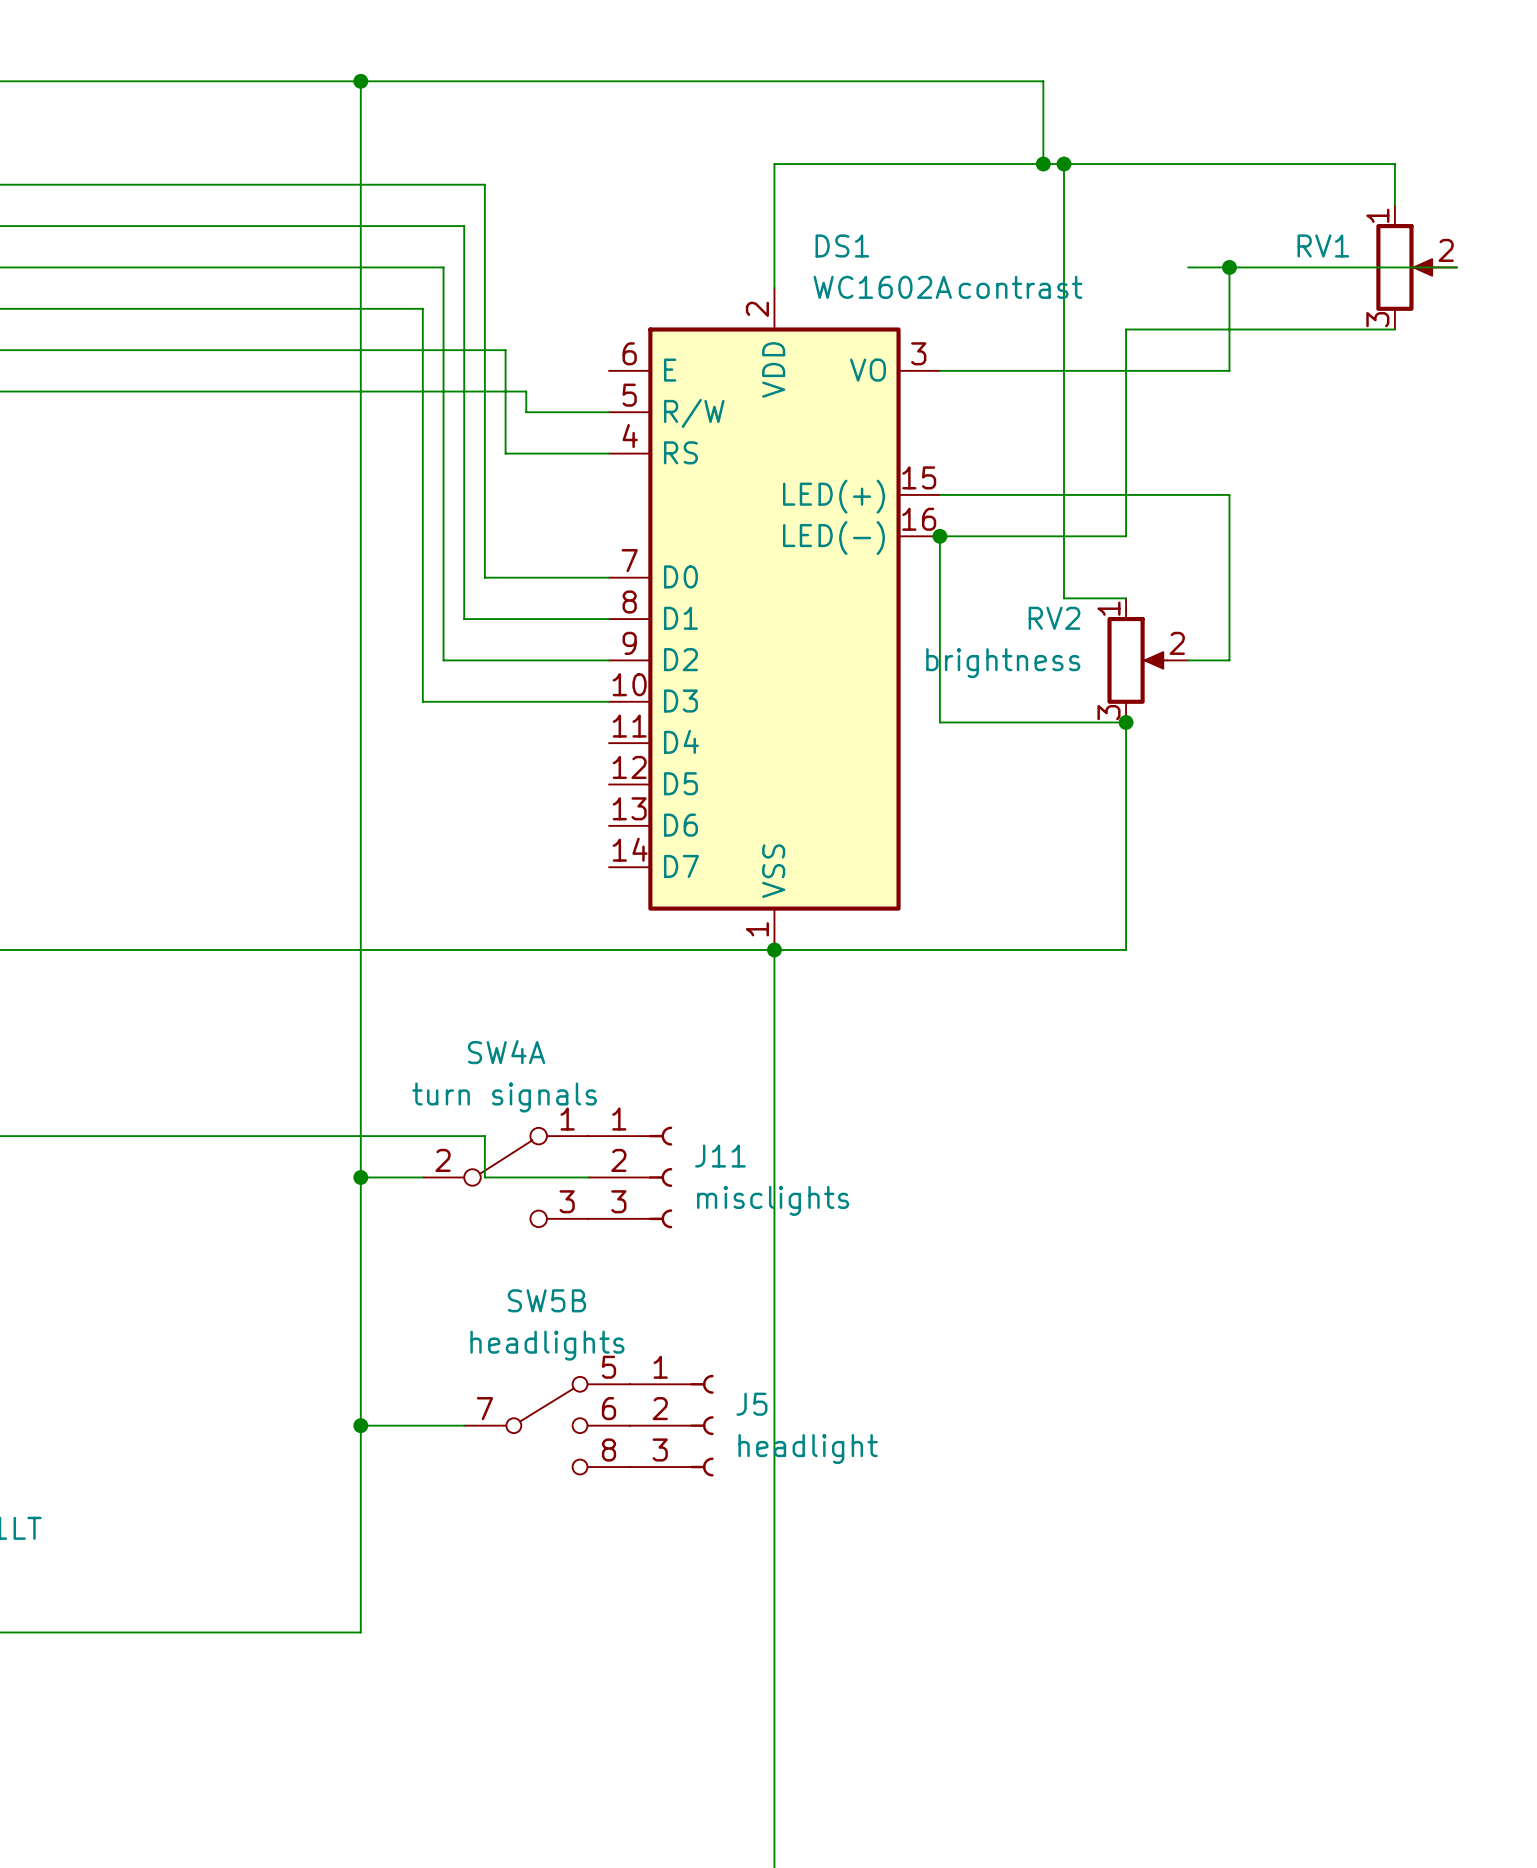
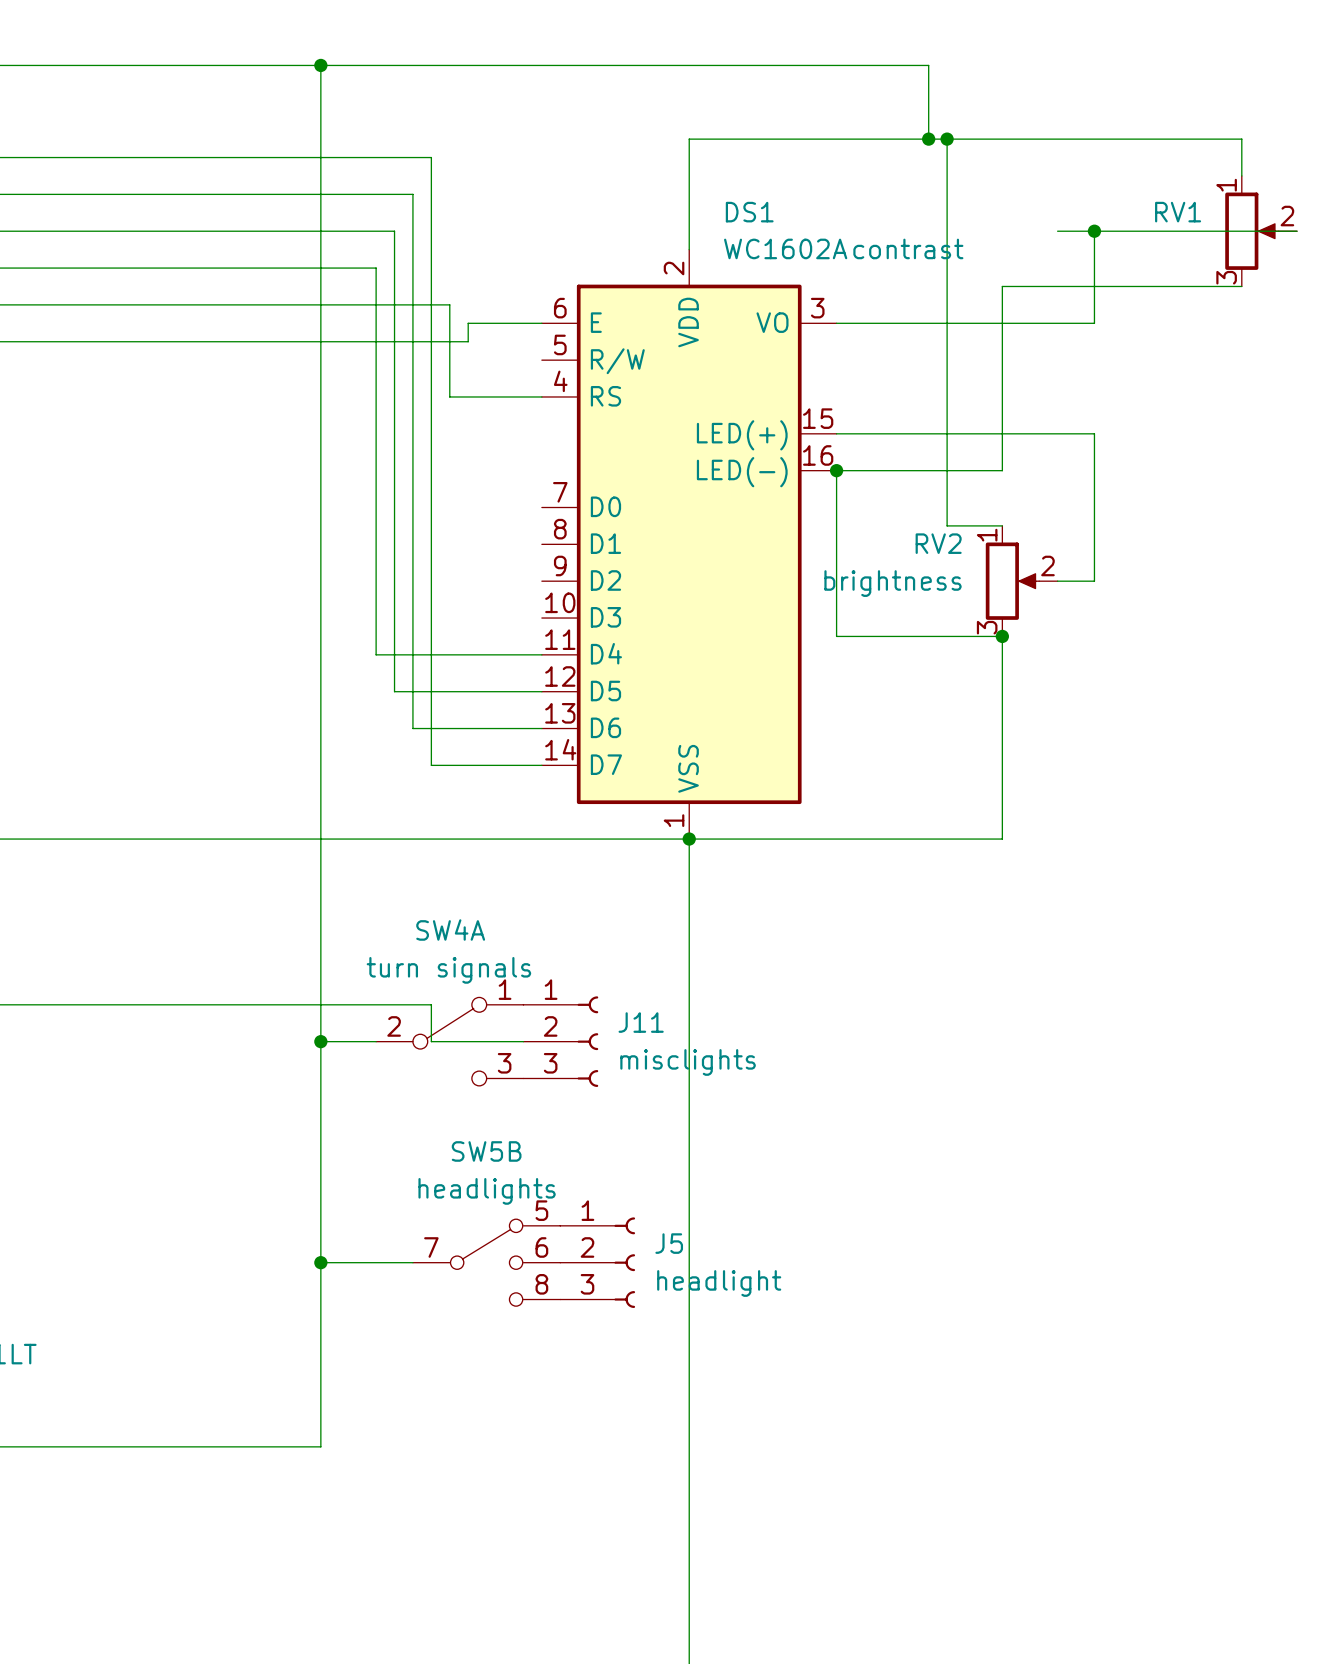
wire: (526, 391) (526, 412) (608, 412) -> (468, 341) (468, 323) (541, 323)
wire: (484, 577) (608, 577) -> (431, 507) (431, 765) (541, 765)
wire: (464, 619) (608, 619) -> (412, 544) (412, 728) (541, 728)
wire: (443, 660) (608, 660) -> (394, 581) (394, 691) (541, 691)
wire: (422, 701) (608, 701) -> (376, 618) (376, 654) (541, 654)

